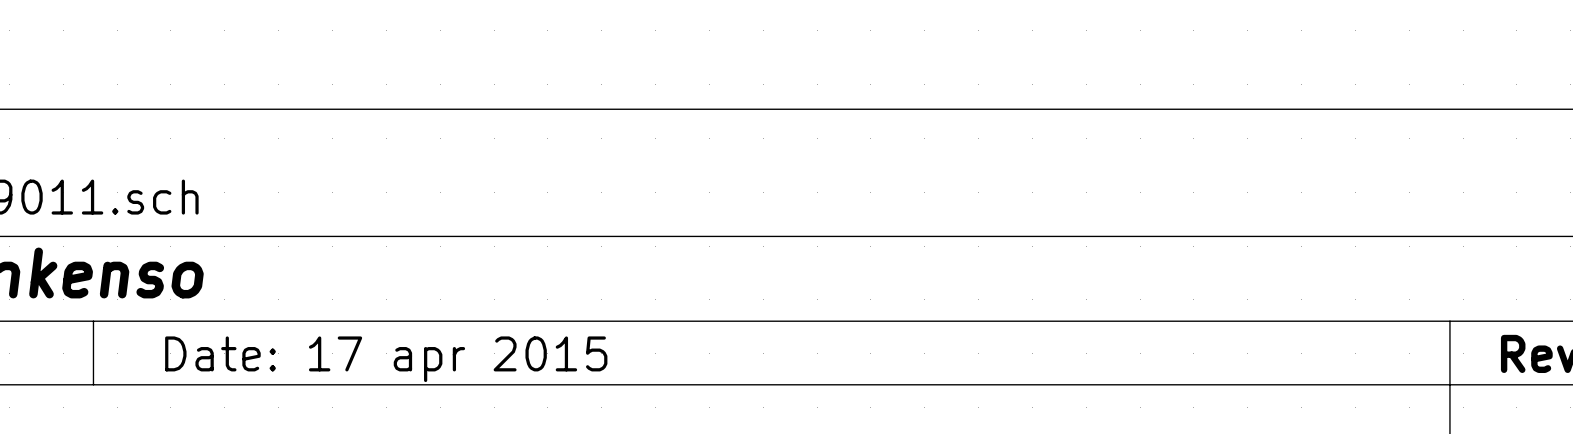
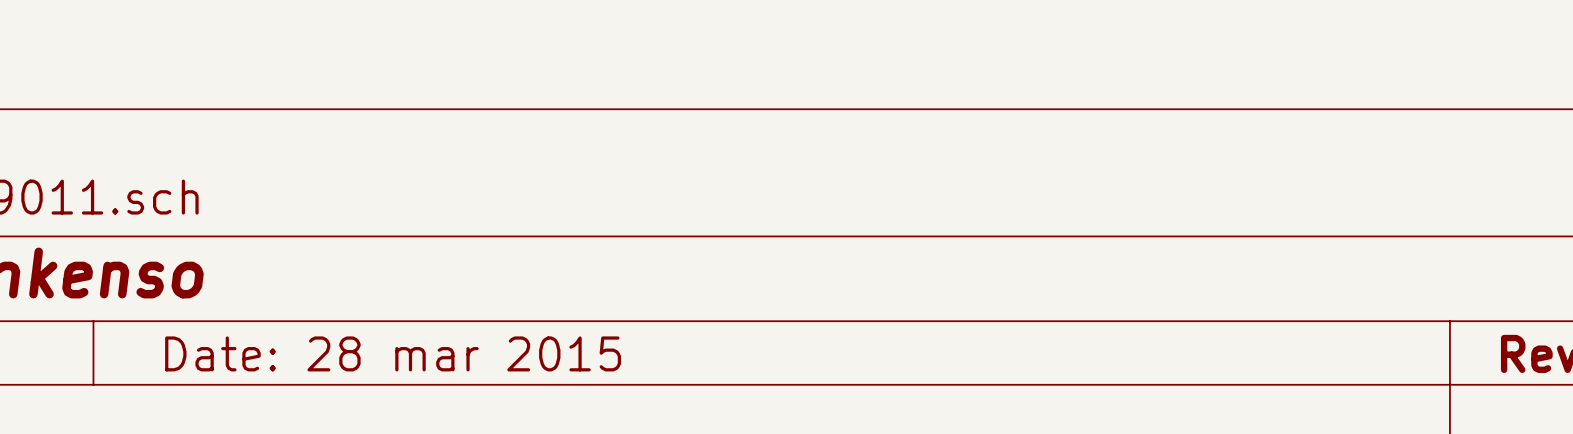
title block: Date: 17 apr 2015 (386, 359) -> Date: 28 mar 2015 (393, 353)

